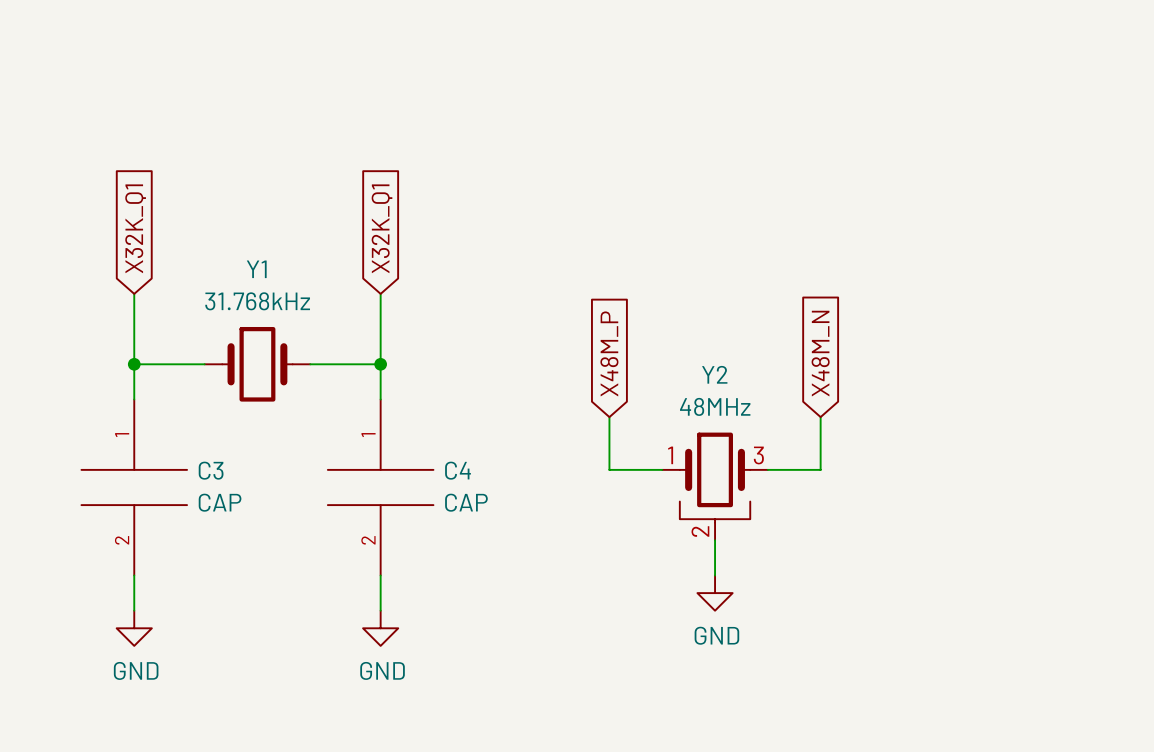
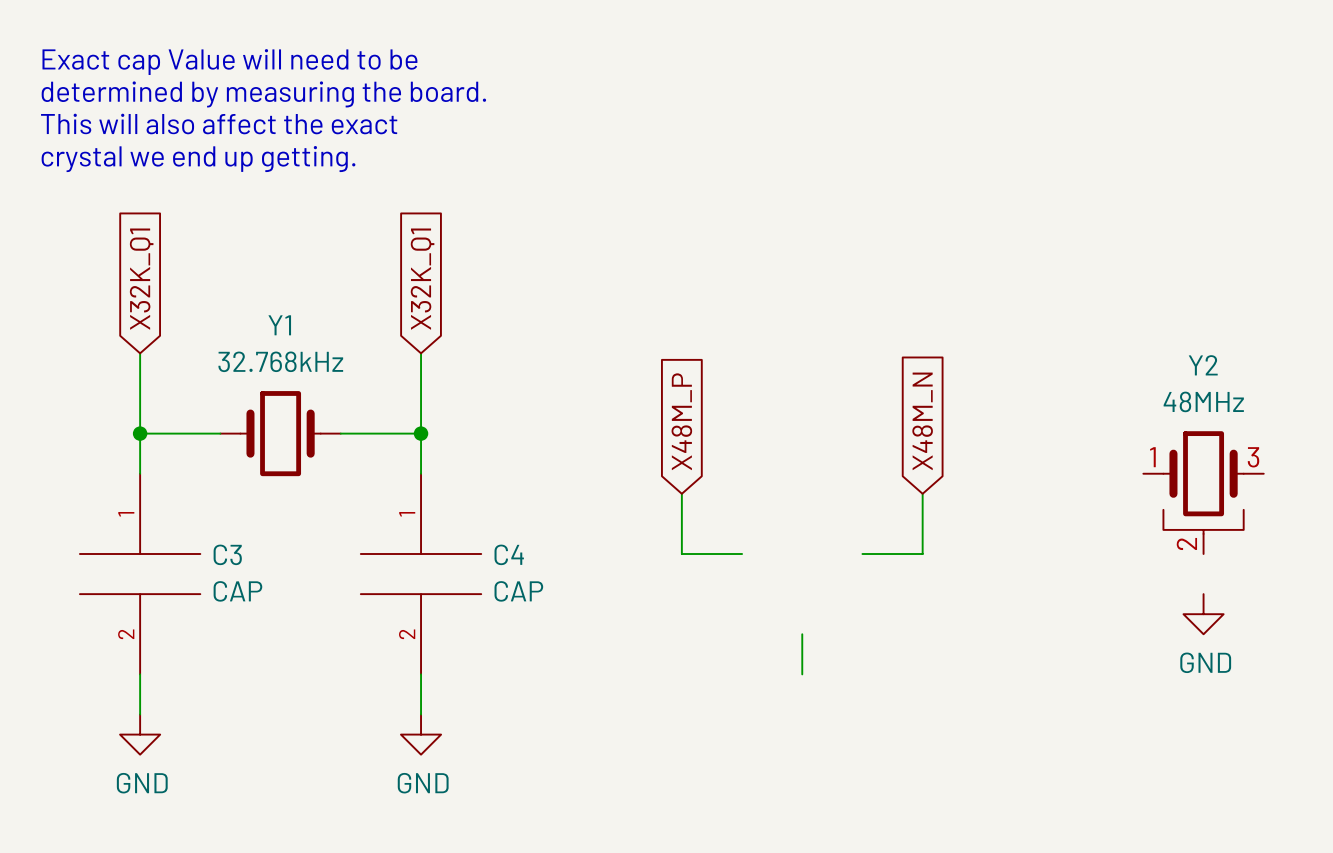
text: none -> Exact cap Value will need to be (229, 62)
text: none -> determined by measuring the board. (263, 94)
text: none -> This will also affect the exact (219, 124)
text: none -> crystal we end up getting. (198, 159)
Y1 value: 31.768kHz (257, 301) -> 32.768kHz (280, 361)
Y2 position: (715, 486) -> (1203, 492)
power symbol: none -> GND (1203, 614)
power symbol: GND (715, 593) -> none

